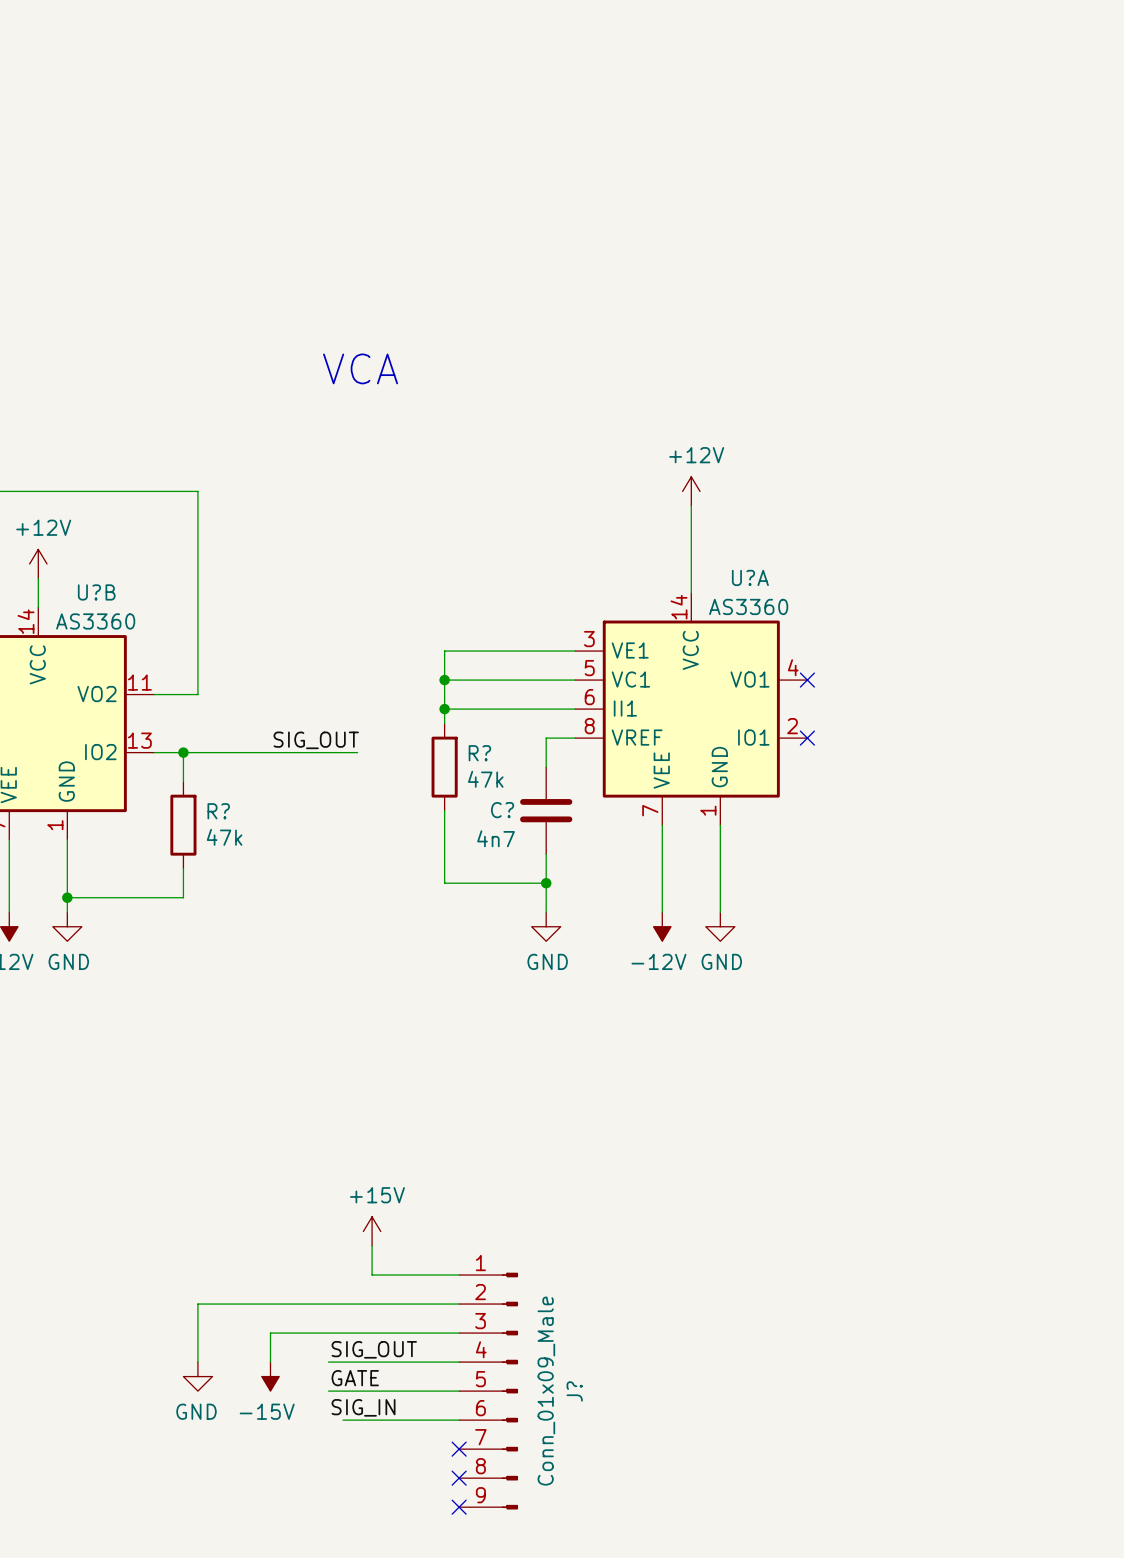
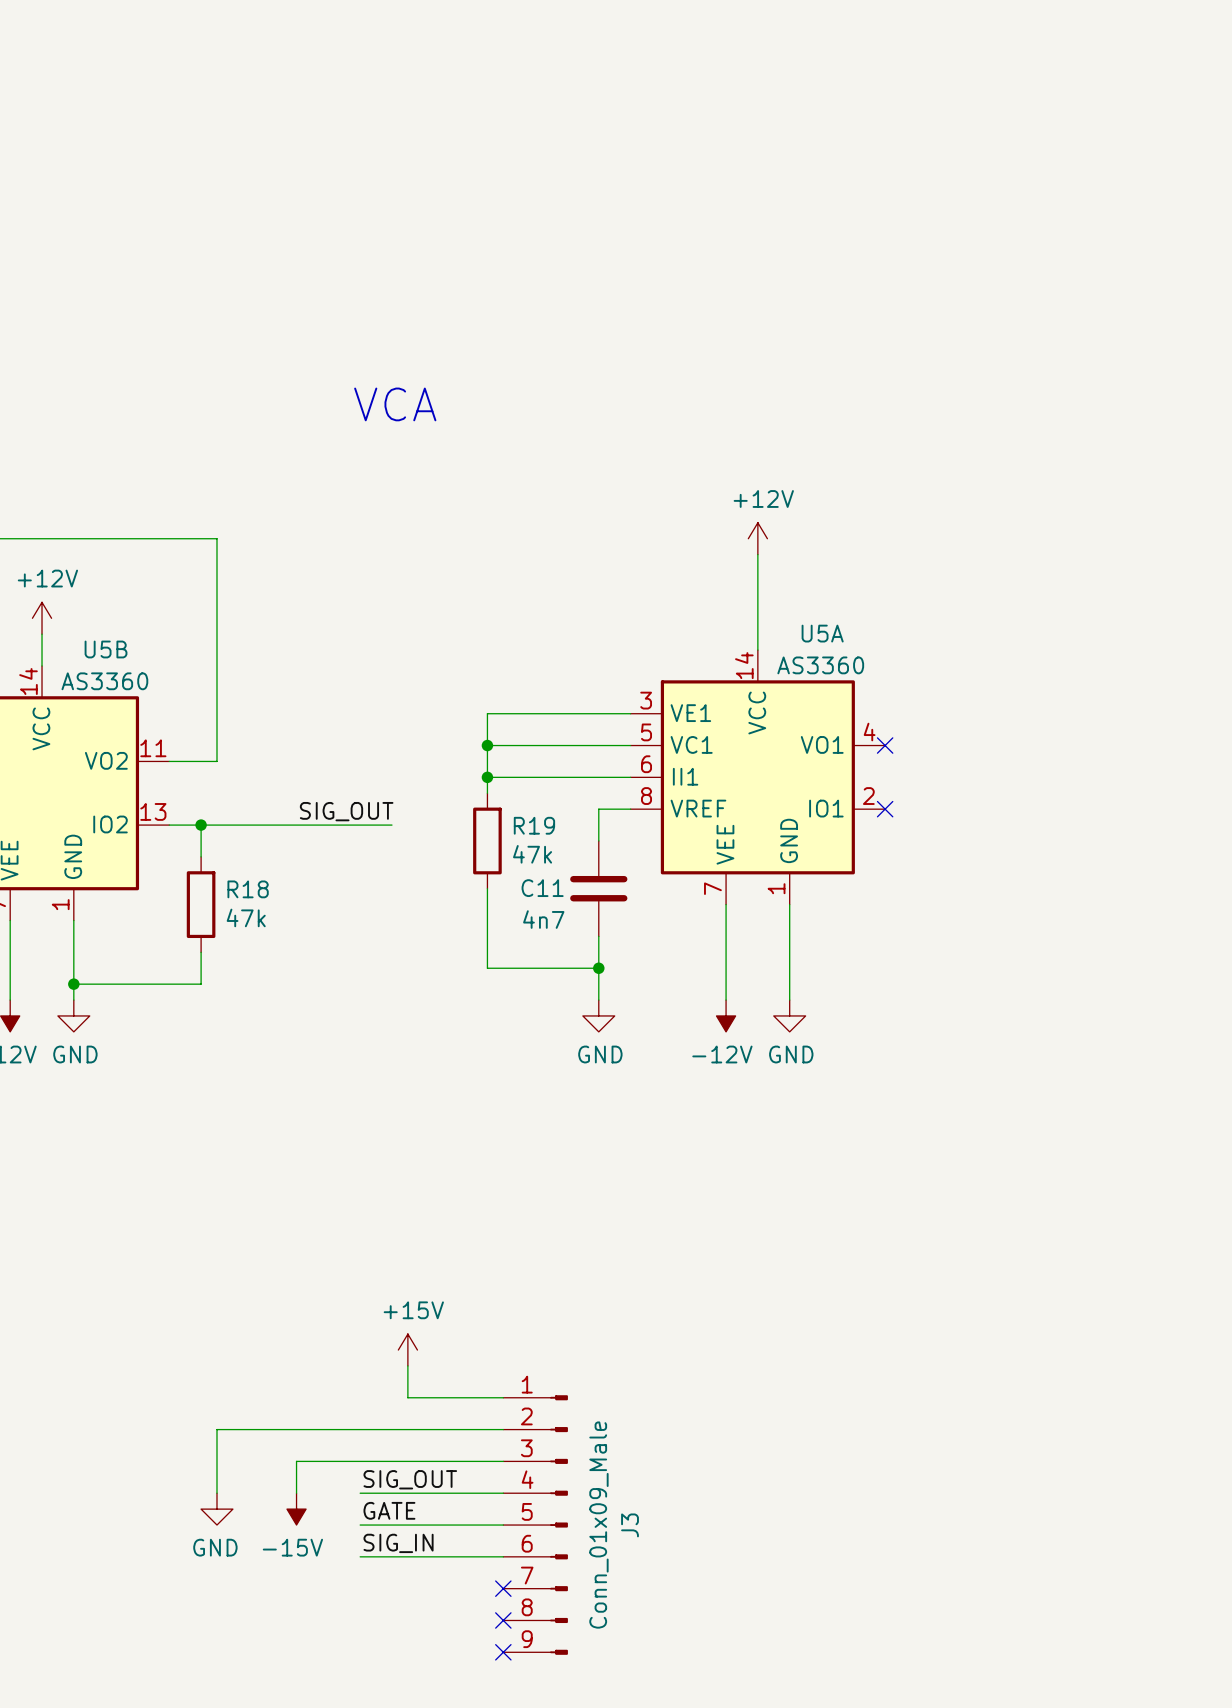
U?A name: U?A (750, 577) -> U5A (822, 633)
U?B name: U?B (96, 592) -> U5B (106, 649)
R? name: R? (479, 753) -> R19 (534, 825)
C? name: C? (502, 810) -> C11 (542, 888)
R? name: R? (218, 811) -> R18 (248, 889)
J? name: J? (574, 1391) -> J3 (630, 1525)
wire: none -> (360, 1556) (376, 1556)

